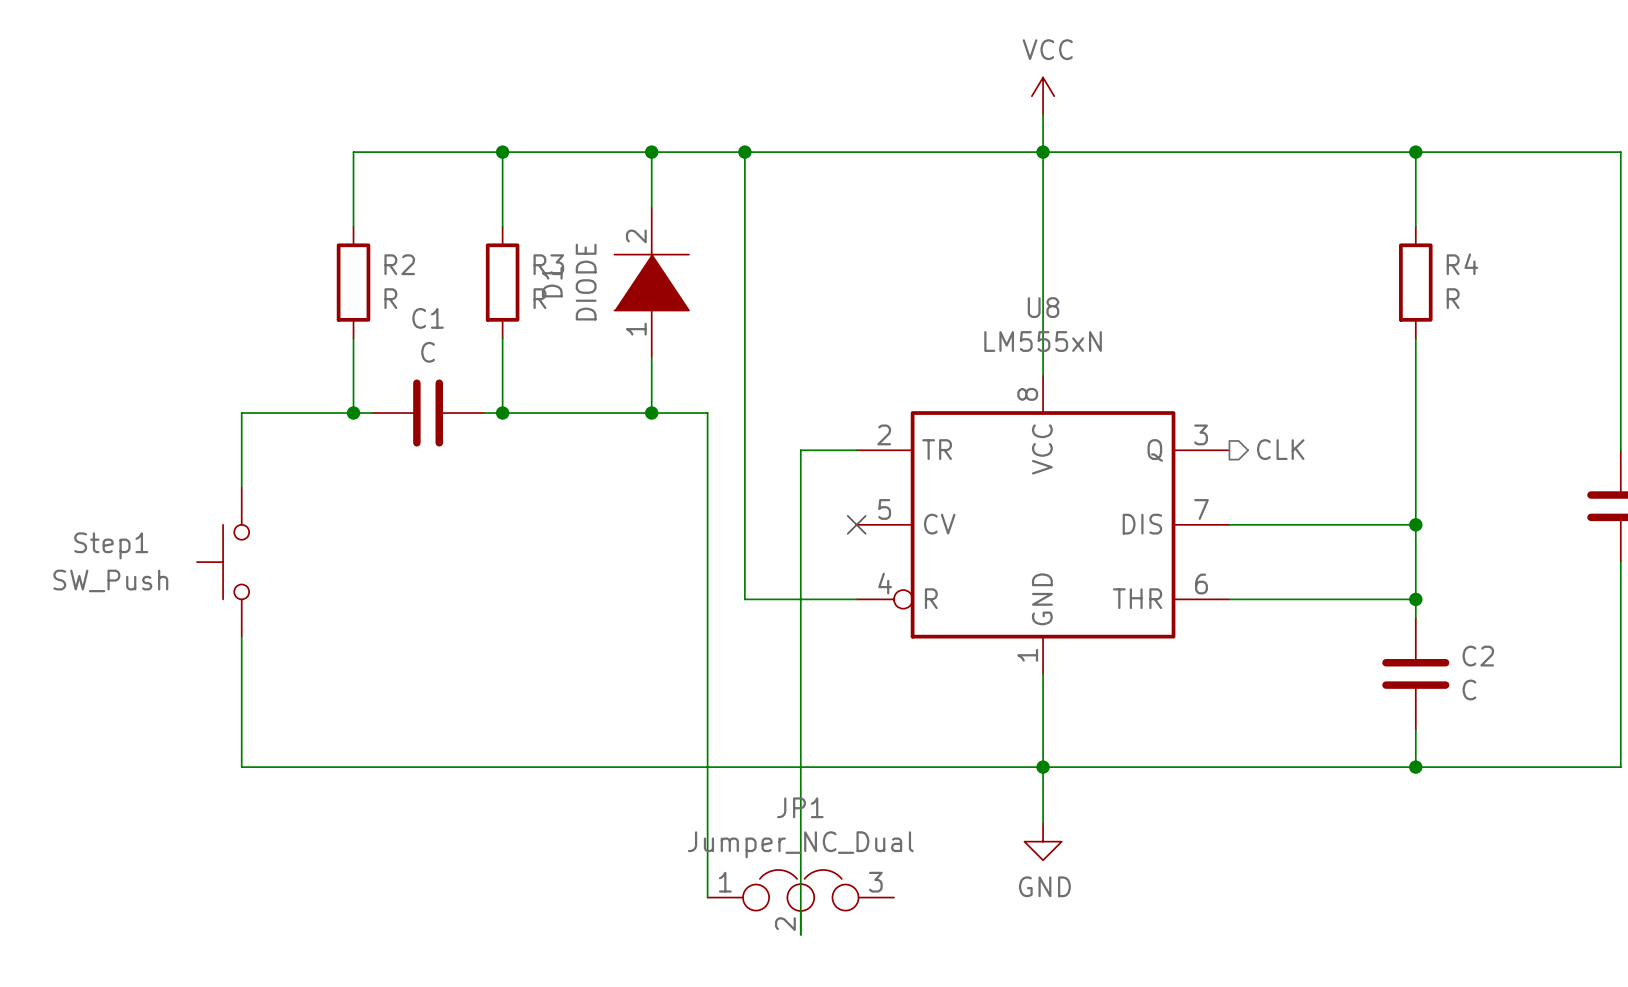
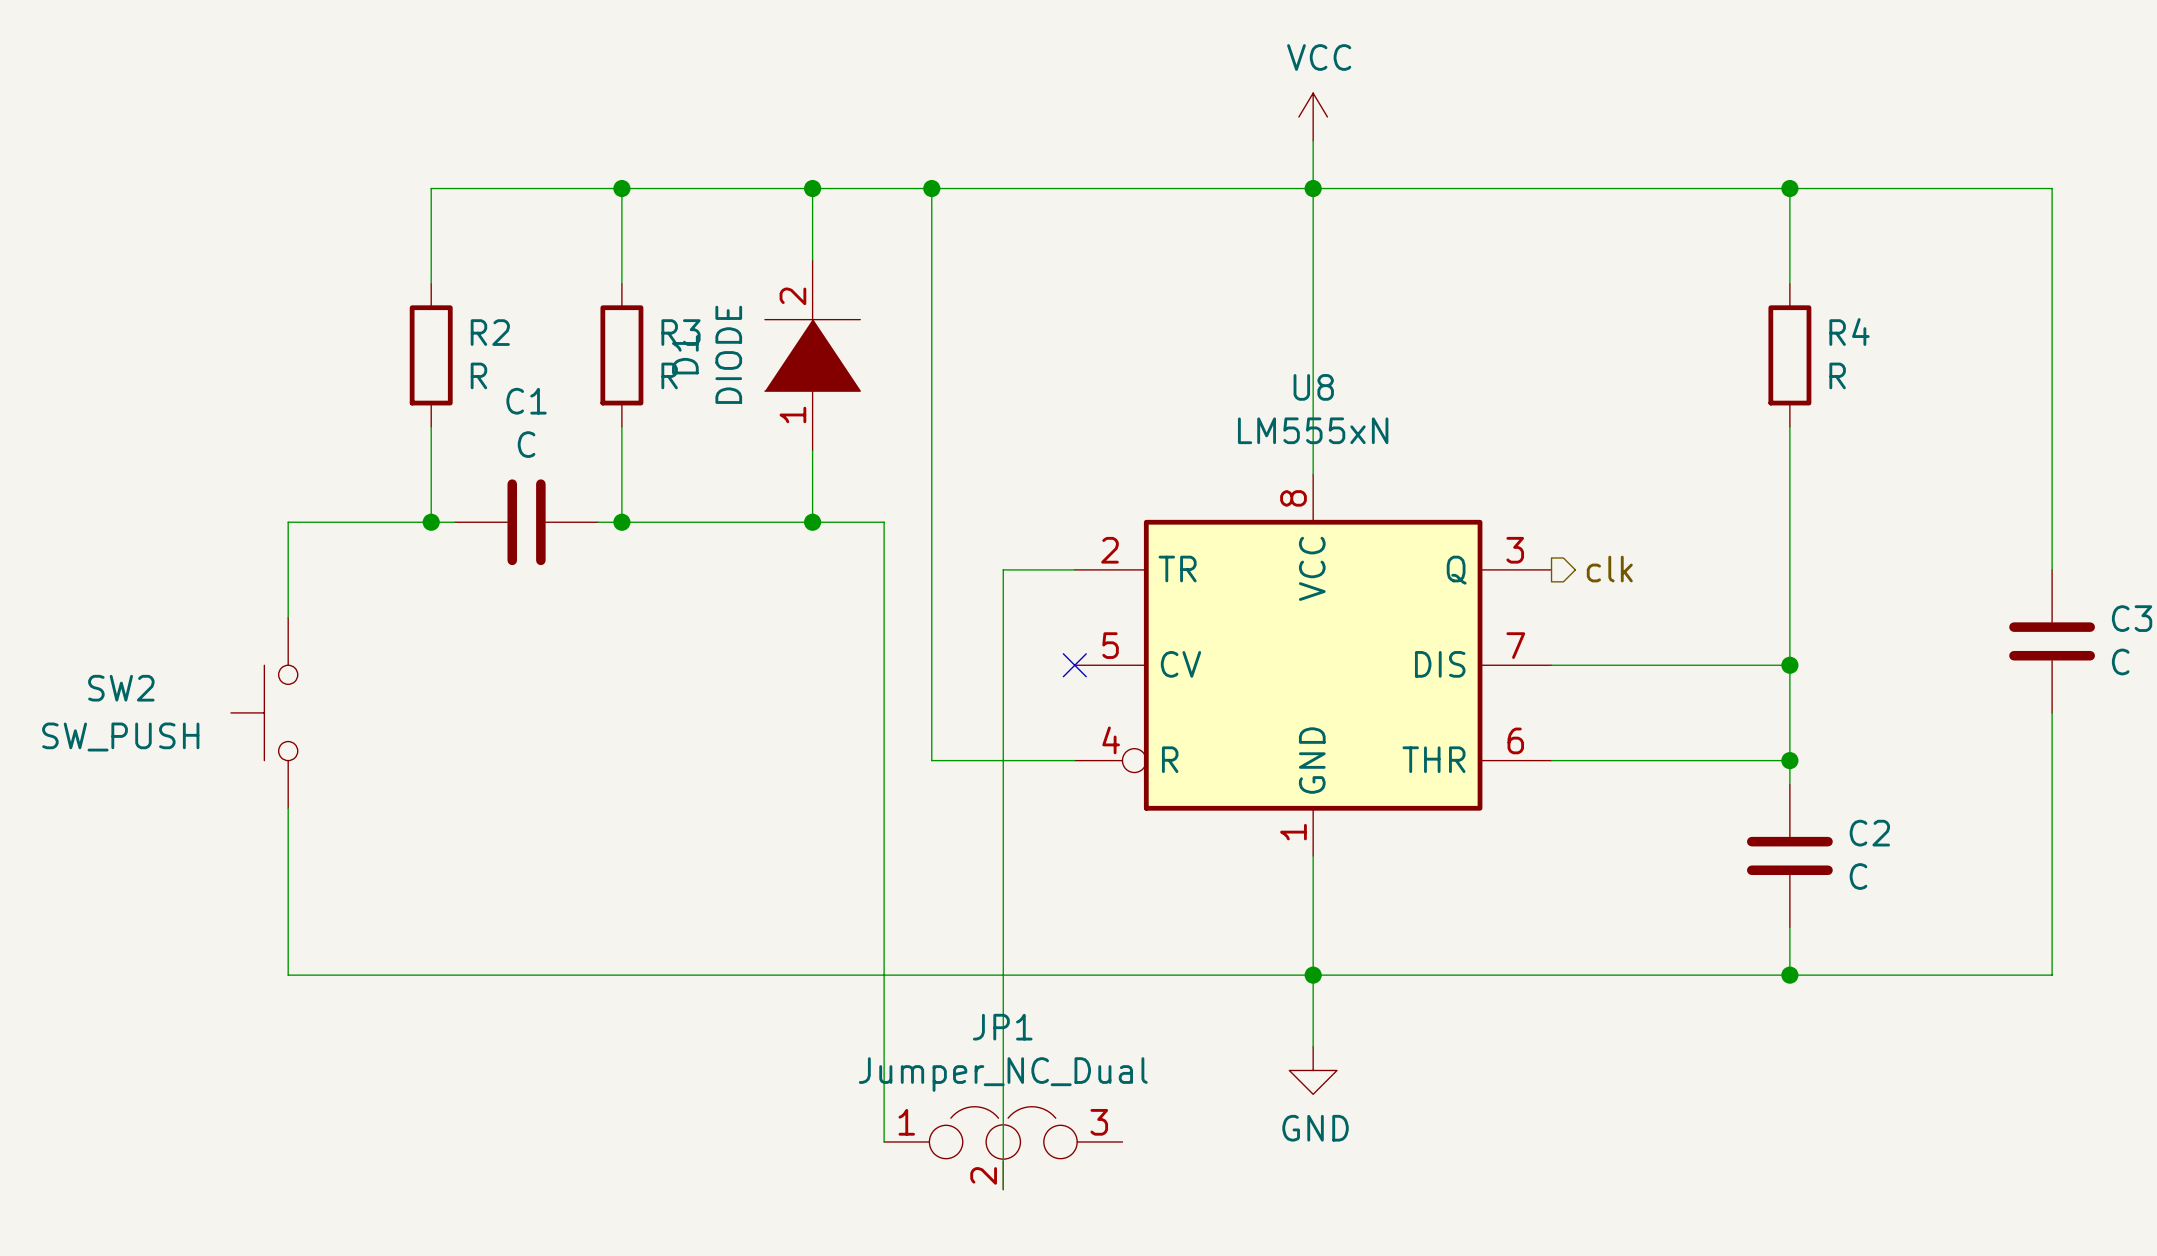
hierarchical label: CLK (1280, 449) -> clk (1609, 569)
Step1 name: Step1 (111, 545) -> SW2 (121, 688)
Step1 value: SW_Push (110, 580) -> SW_PUSH (120, 737)

